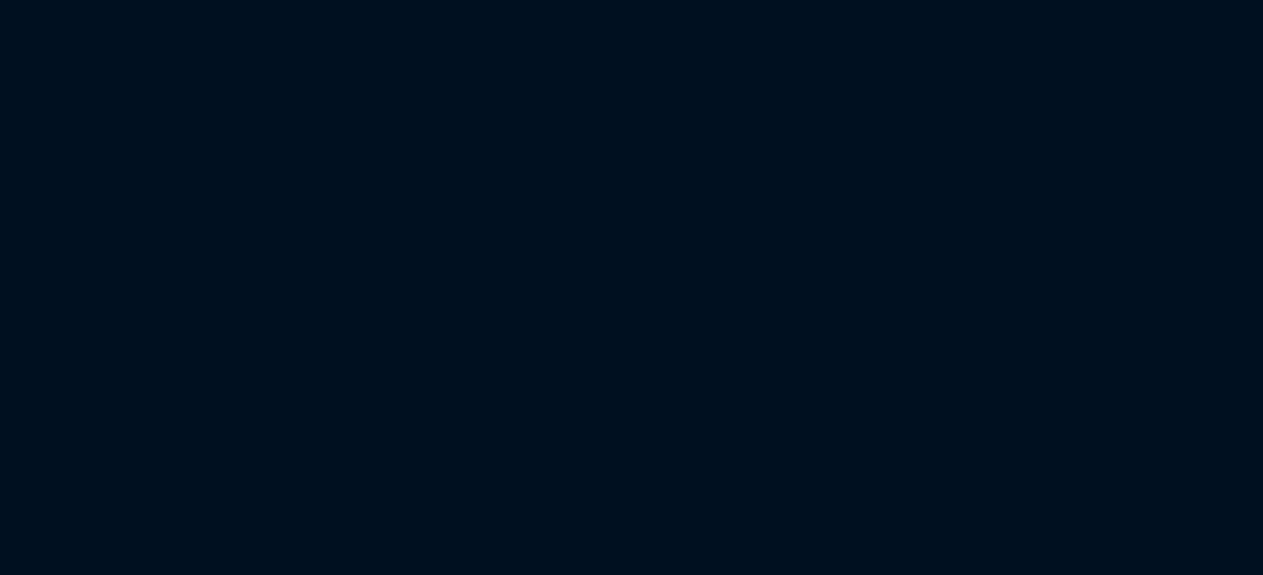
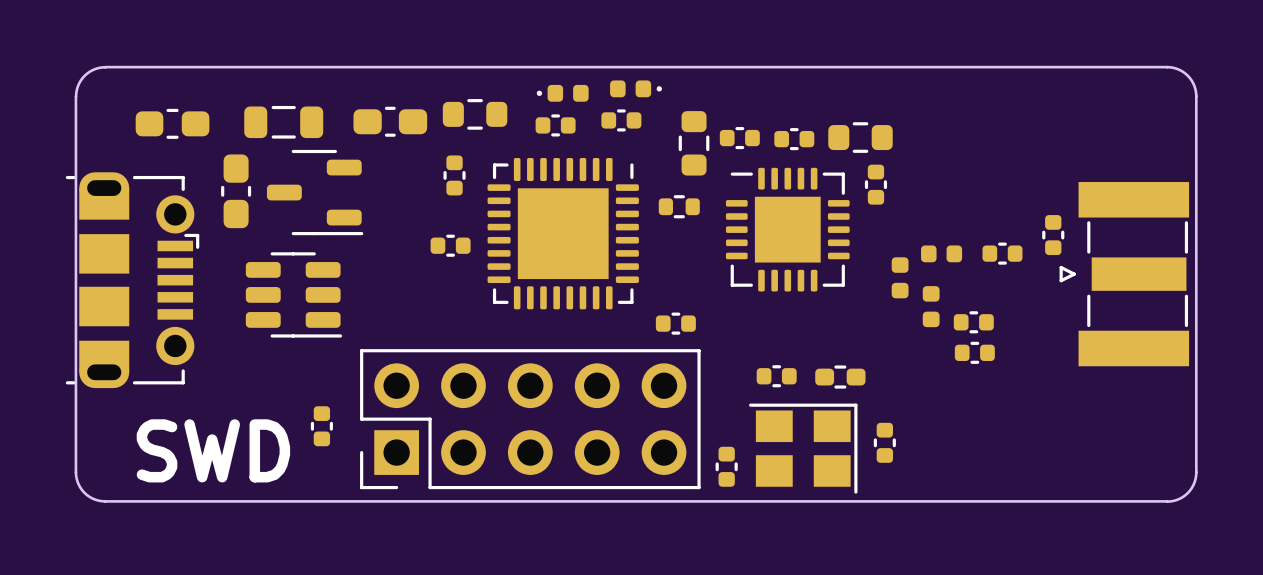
board edge: none -> (105, 67) (1167, 67) (1176, 68) (1185, 73) (1191, 80) (1196, 96) (1196, 472) (1194, 482) (1187, 493) (1176, 500) (1167, 501)
board edge: none -> (105, 67) (95, 68) (84, 75) (77, 86) (76, 96)
part: none -> (636, 88)
part: none -> (562, 93)
board edge: none -> (75, 96) (75, 472) (80, 487) (86, 495) (95, 499) (105, 501) (1167, 501)
part: none -> (475, 114)
part: none -> (621, 120)
part: none -> (390, 121)
part: none -> (283, 122)
part: none -> (172, 123)
part: none -> (555, 125)
part: none -> (860, 137)
part: none -> (739, 138)
part: none -> (794, 139)
part: none -> (694, 143)
part: none -> (454, 175)
part: none -> (875, 184)
part: none -> (236, 191)
part: none -> (315, 192)
part: none -> (679, 206)
part: none -> (787, 229)
part: none -> (563, 233)
part: none -> (1053, 235)
part: none -> (450, 245)
part: none -> (941, 253)
part: none -> (1002, 253)
part: none -> (1124, 274)
part: none -> (900, 277)
part: none -> (132, 280)
part: none -> (294, 294)
part: none -> (931, 306)
part: none -> (973, 322)
part: none -> (675, 323)
part: none -> (974, 352)
part: none -> (776, 376)
part: none -> (840, 377)
part: none -> (530, 419)
part: none -> (321, 426)
part: none -> (884, 442)
part: none -> (803, 448)
text: none -> SWD (213, 450)
part: none -> (726, 466)

